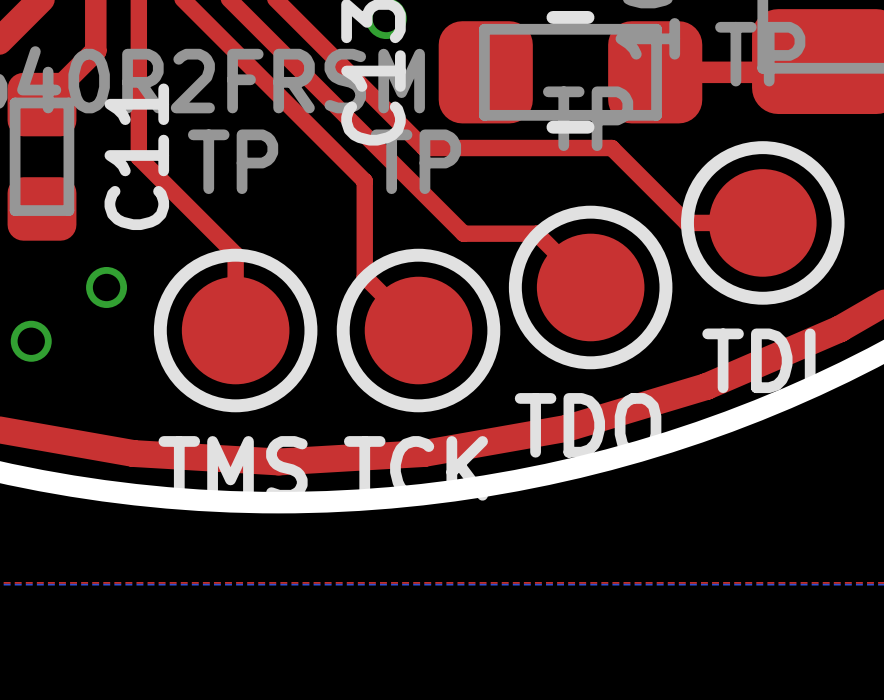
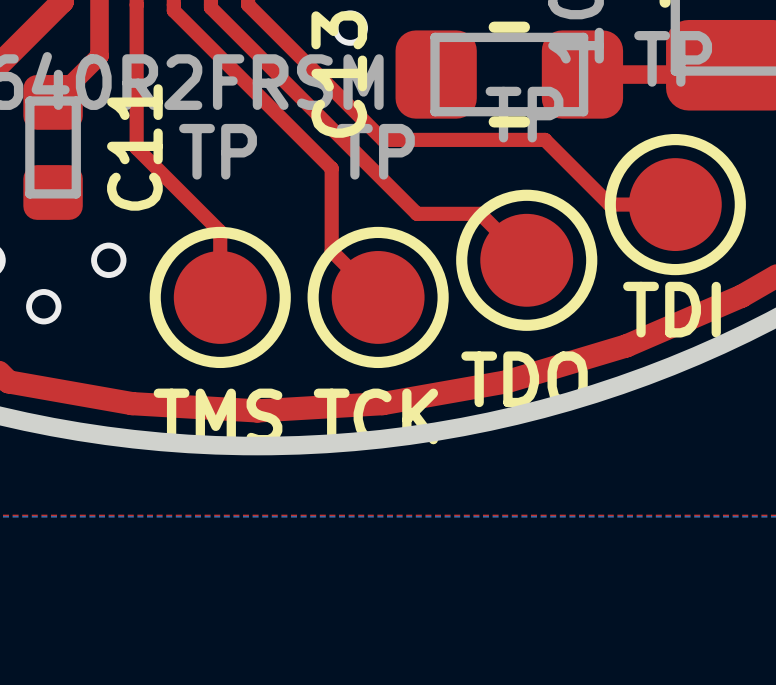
TDI name position: TDI (758, 360) -> TDI (672, 309)

